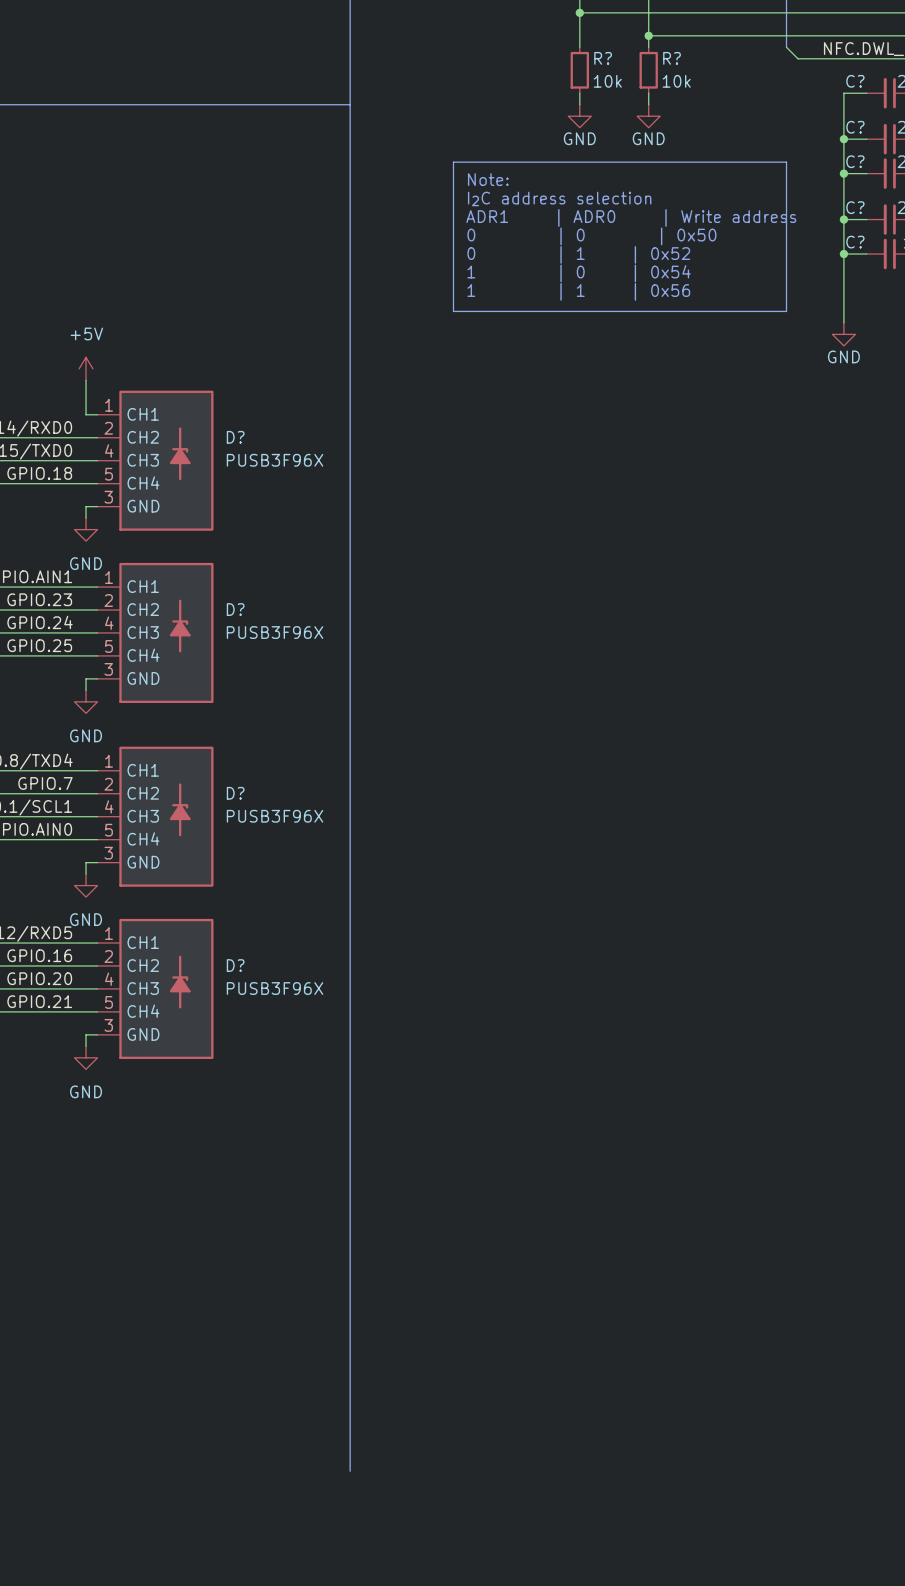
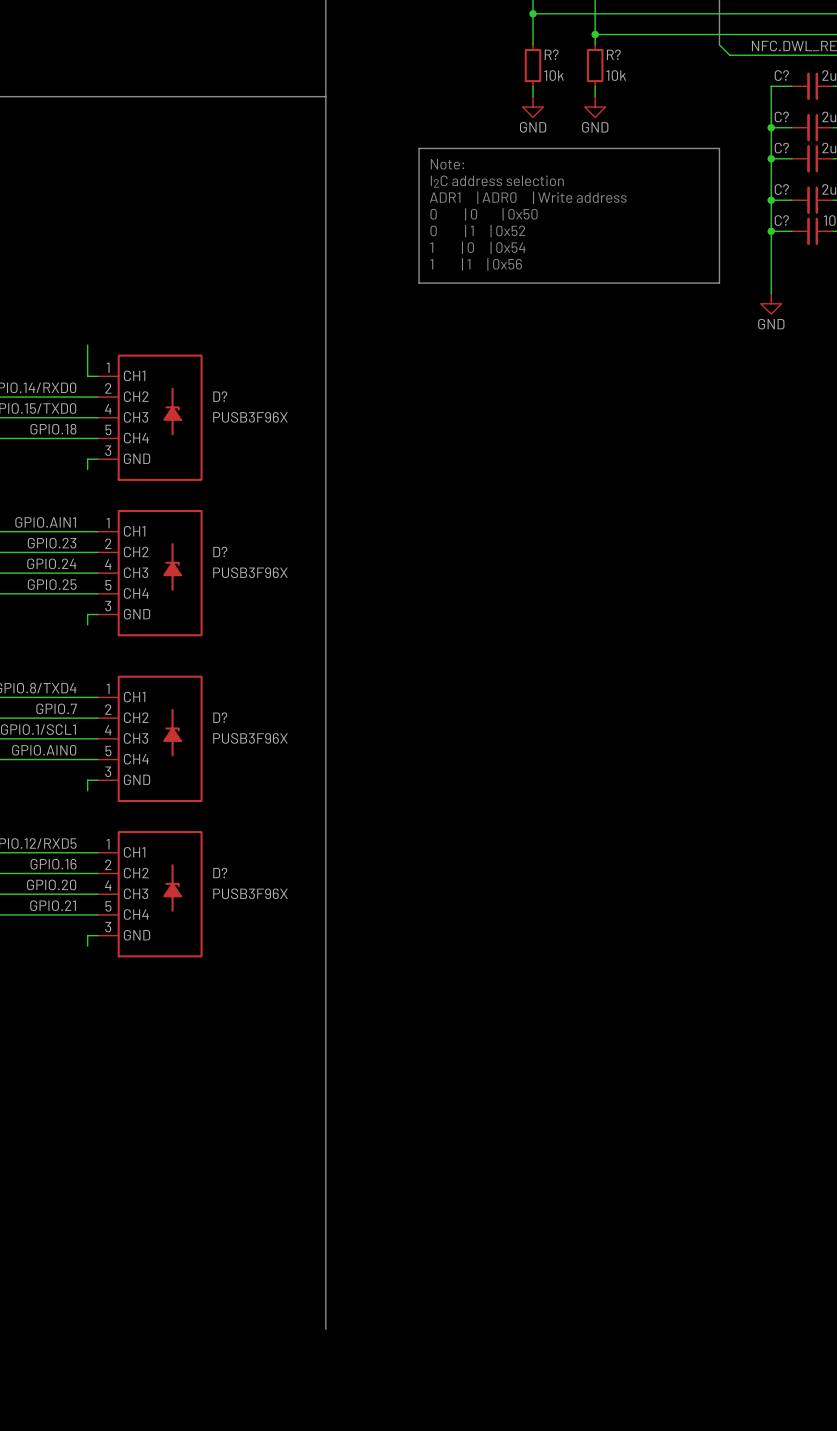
power symbol: +5V (86, 368) -> none
power symbol: GND (86, 529) -> none
power symbol: GND (86, 701) -> none
power symbol: GND (86, 885) -> none
power symbol: GND (86, 1057) -> none

